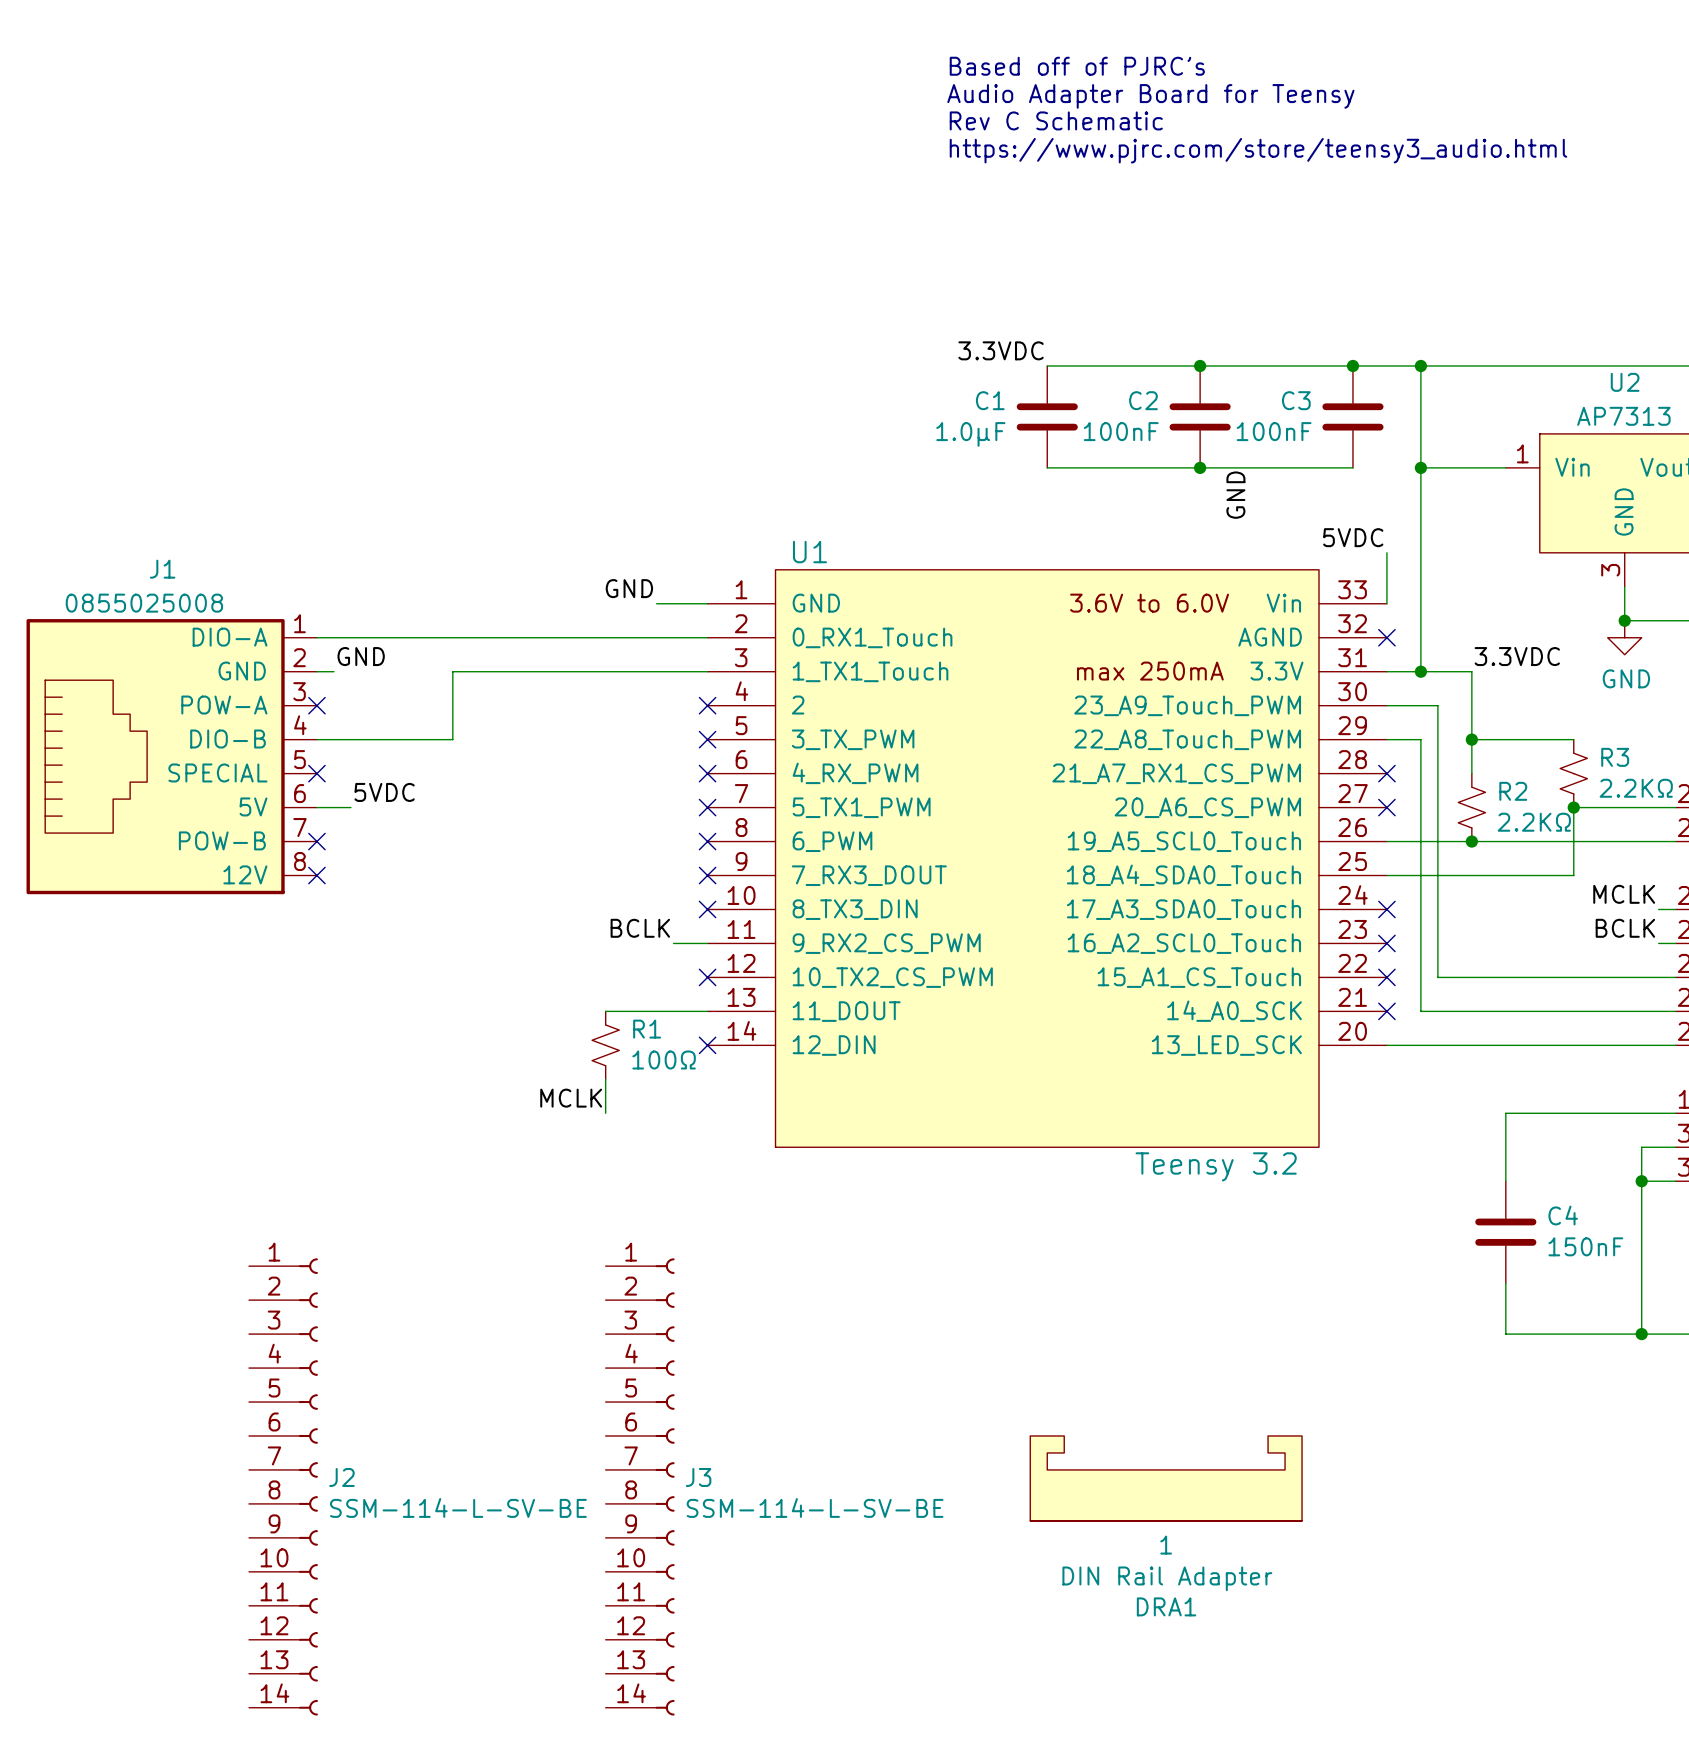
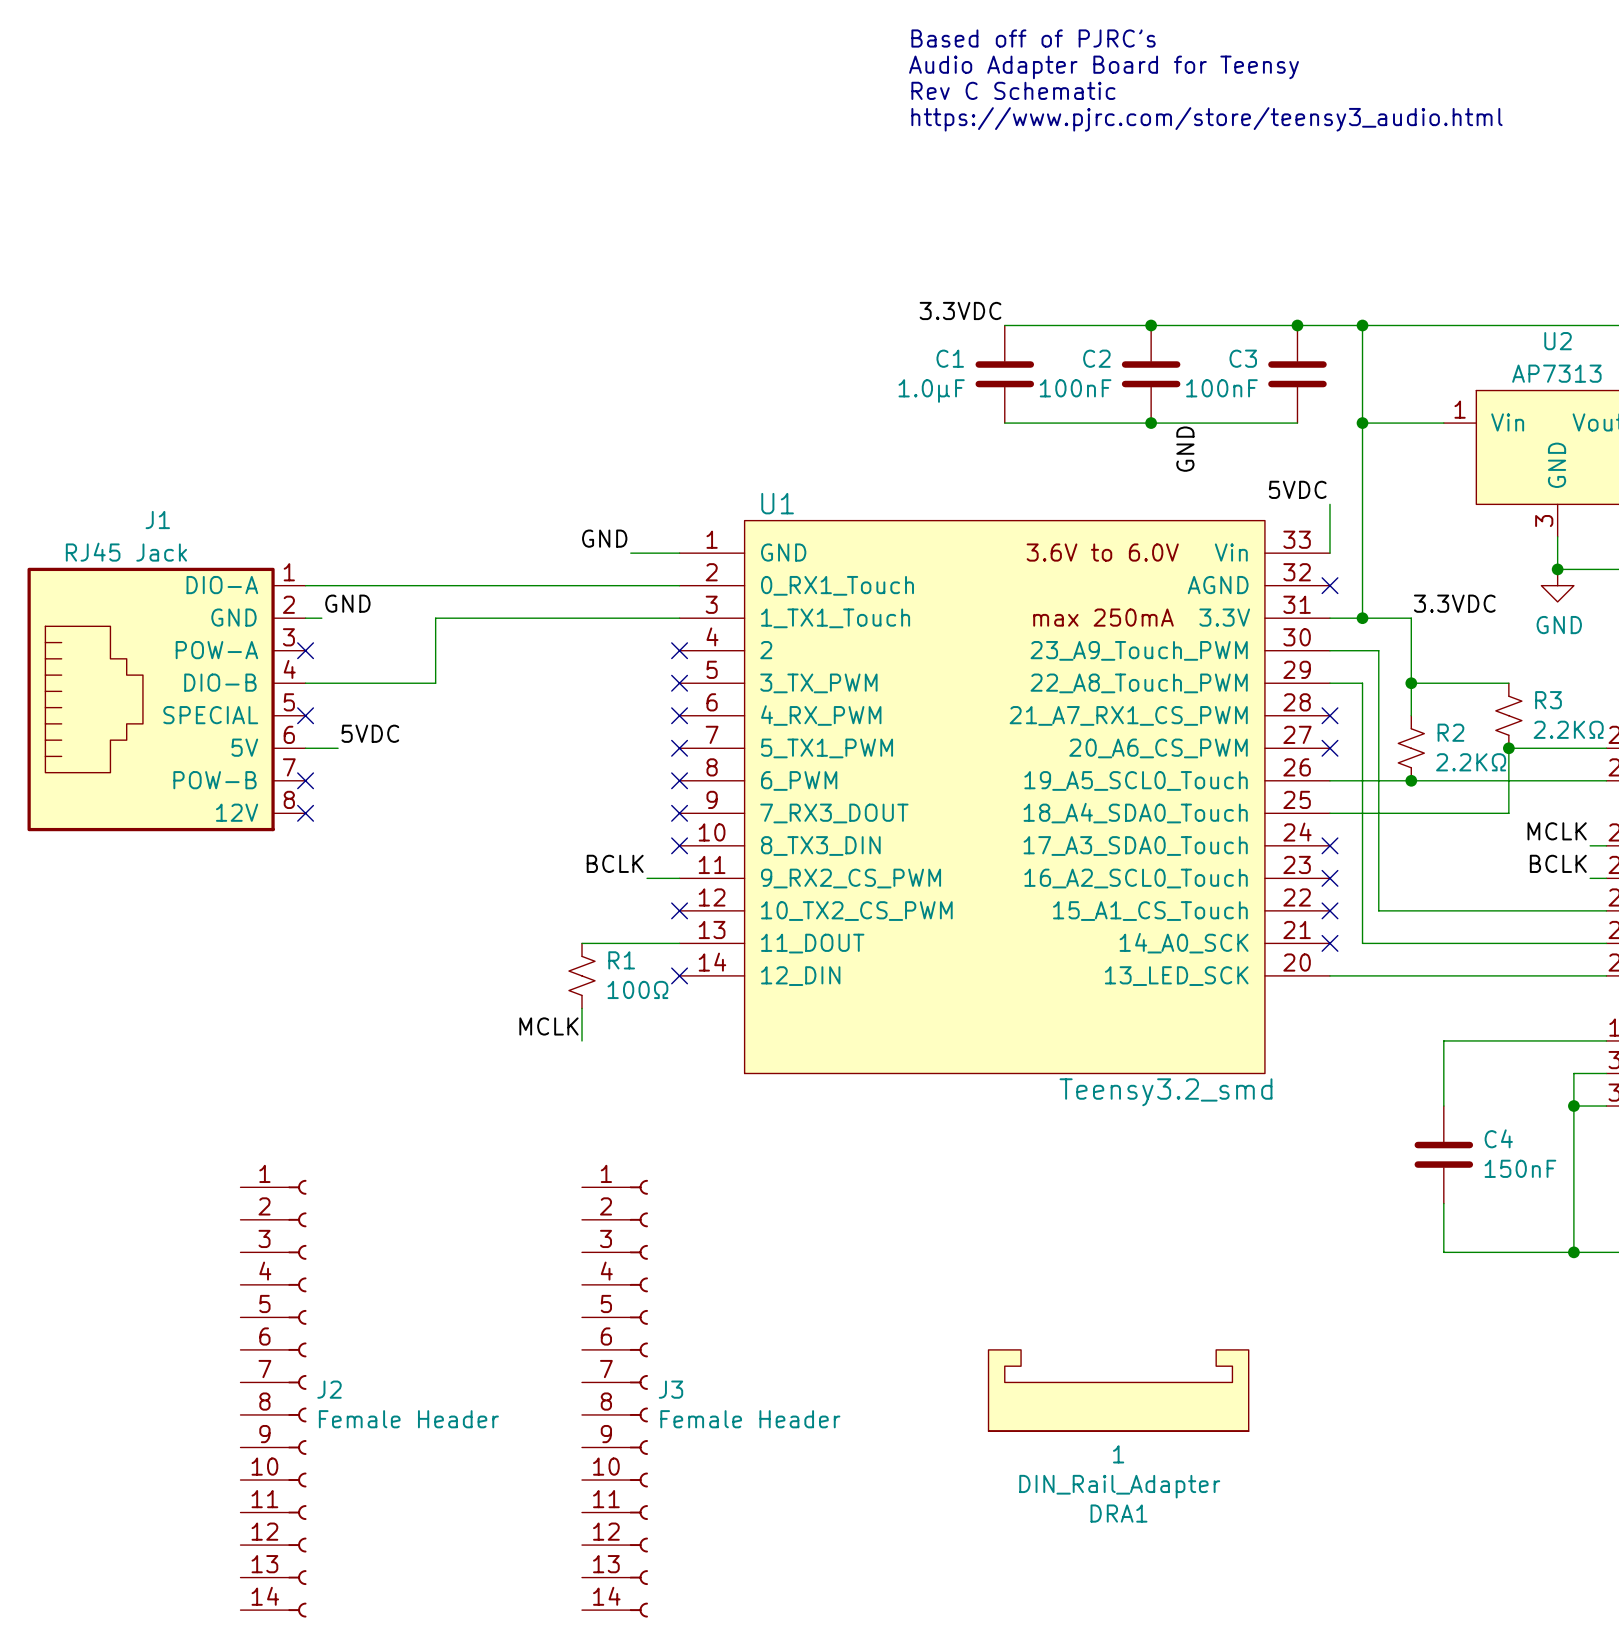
J1 value: 0855025008 (144, 603) -> RJ45 Jack (126, 552)
U1 value: Teensy 3.2 (1216, 1166) -> Teensy3.2_smd (1165, 1092)
J2 value: SSM-114-L-SV-BE (458, 1507) -> Female Header (408, 1419)
J3 value: SSM-114-L-SV-BE (815, 1507) -> Female Header (750, 1419)
DRA1 value: DIN Rail Adapter (1167, 1578) -> DIN_Rail_Adapter (1119, 1486)

